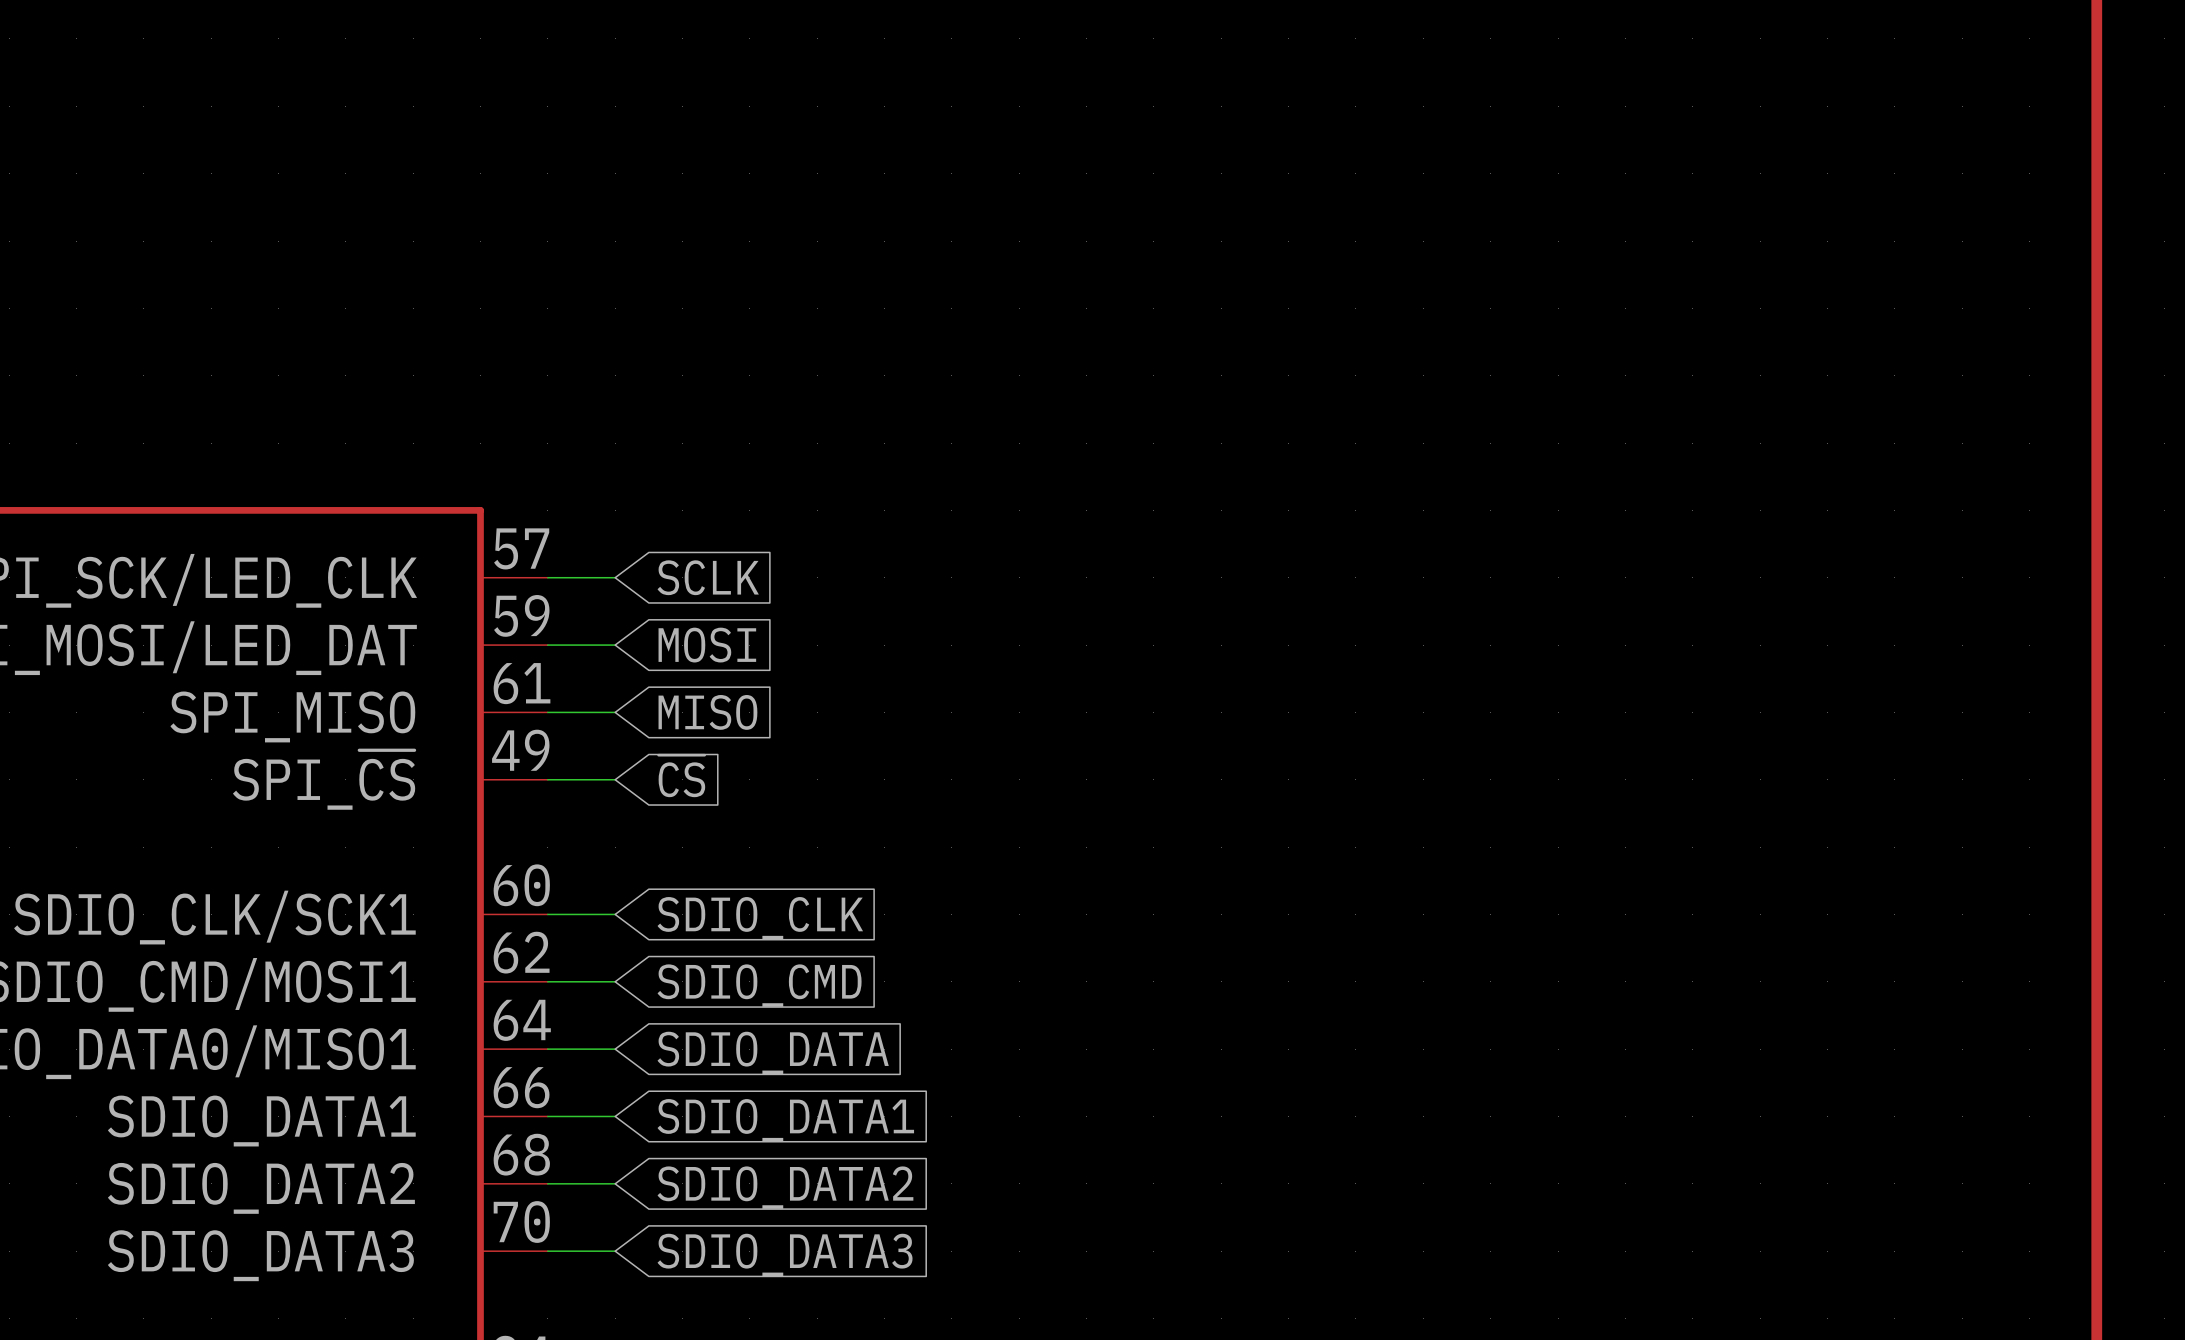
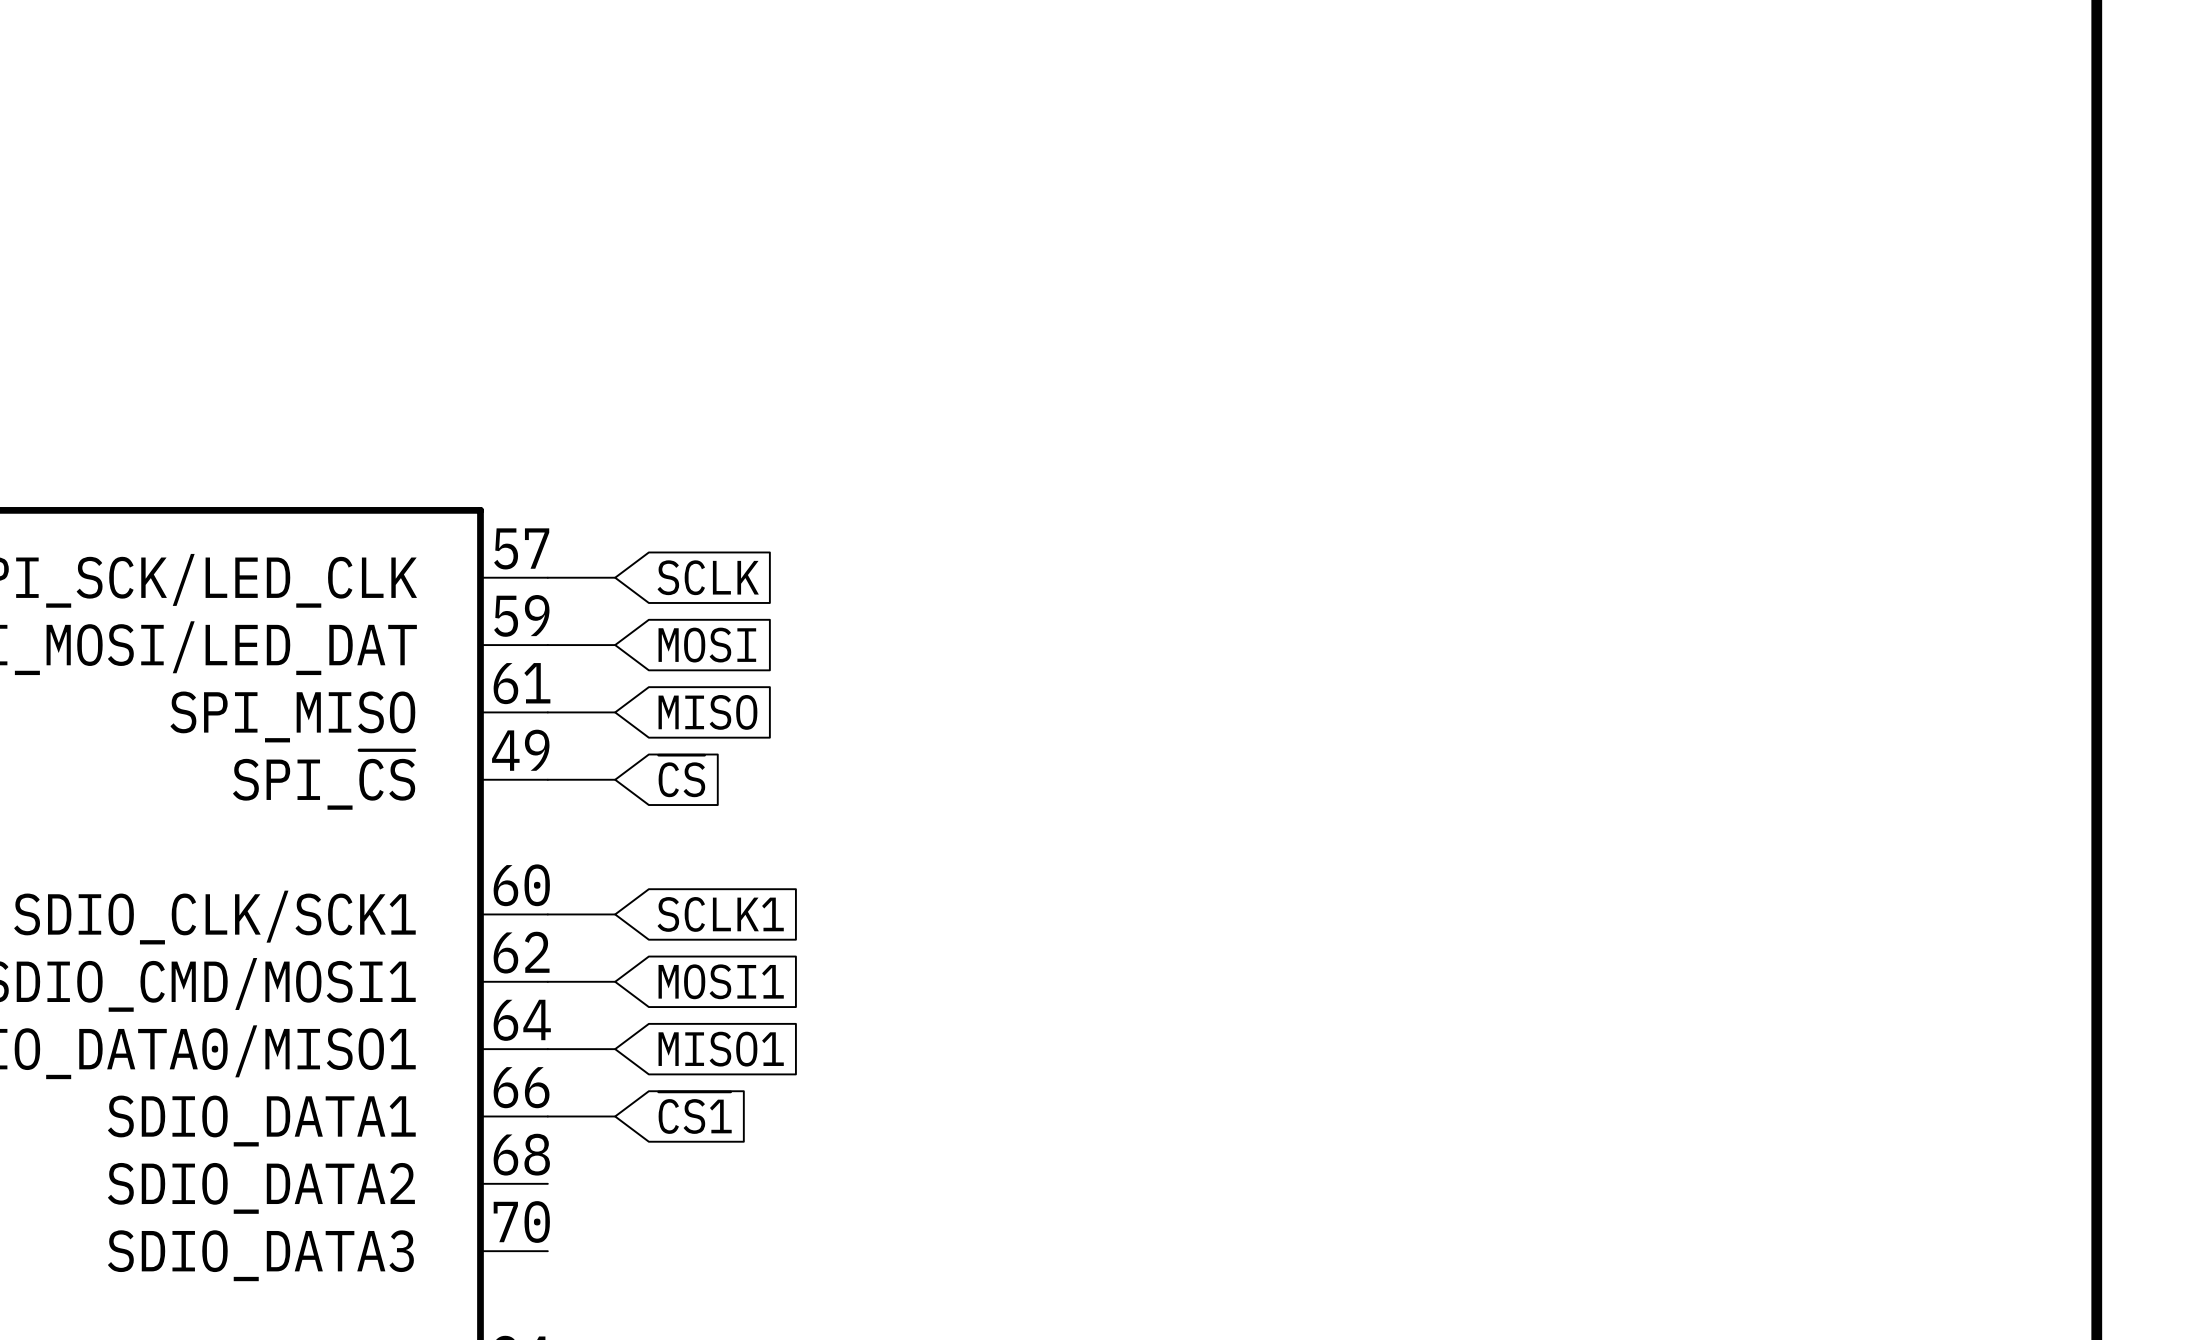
global label: SDIO_CLK (760, 918) -> SCLK1 (720, 914)
global label: SDIO_CMD (759, 985) -> MOSI1 (721, 981)
global label: SDIO_DATA (773, 1052) -> MISO1 (721, 1049)
global label: SDIO_DATA1 (785, 1120) -> ~{CS1} (695, 1112)
wire: (547, 1183) (615, 1183) -> none
global label: SDIO_DATA2 (785, 1187) -> none
wire: (547, 1251) (615, 1251) -> none
global label: SDIO_DATA3 (785, 1254) -> none

